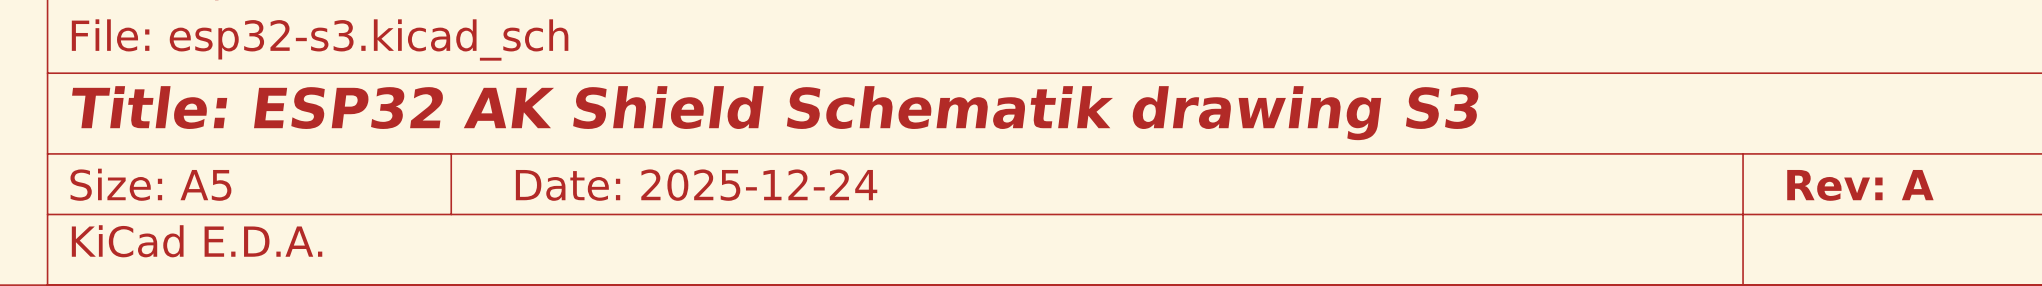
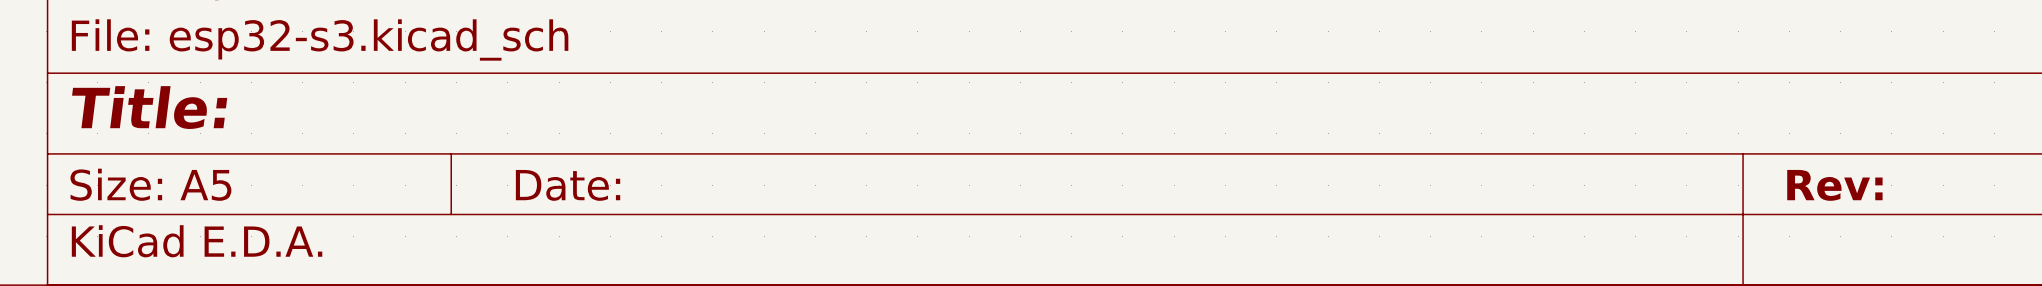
title block: Title: ESP32 AK Shield Schematik drawing S3 (775, 113) -> Title: (149, 107)
title block: Date: 2025-12-24 (696, 185) -> Date: (568, 185)
title block: Rev: A (1860, 185) -> Rev: (1834, 185)

